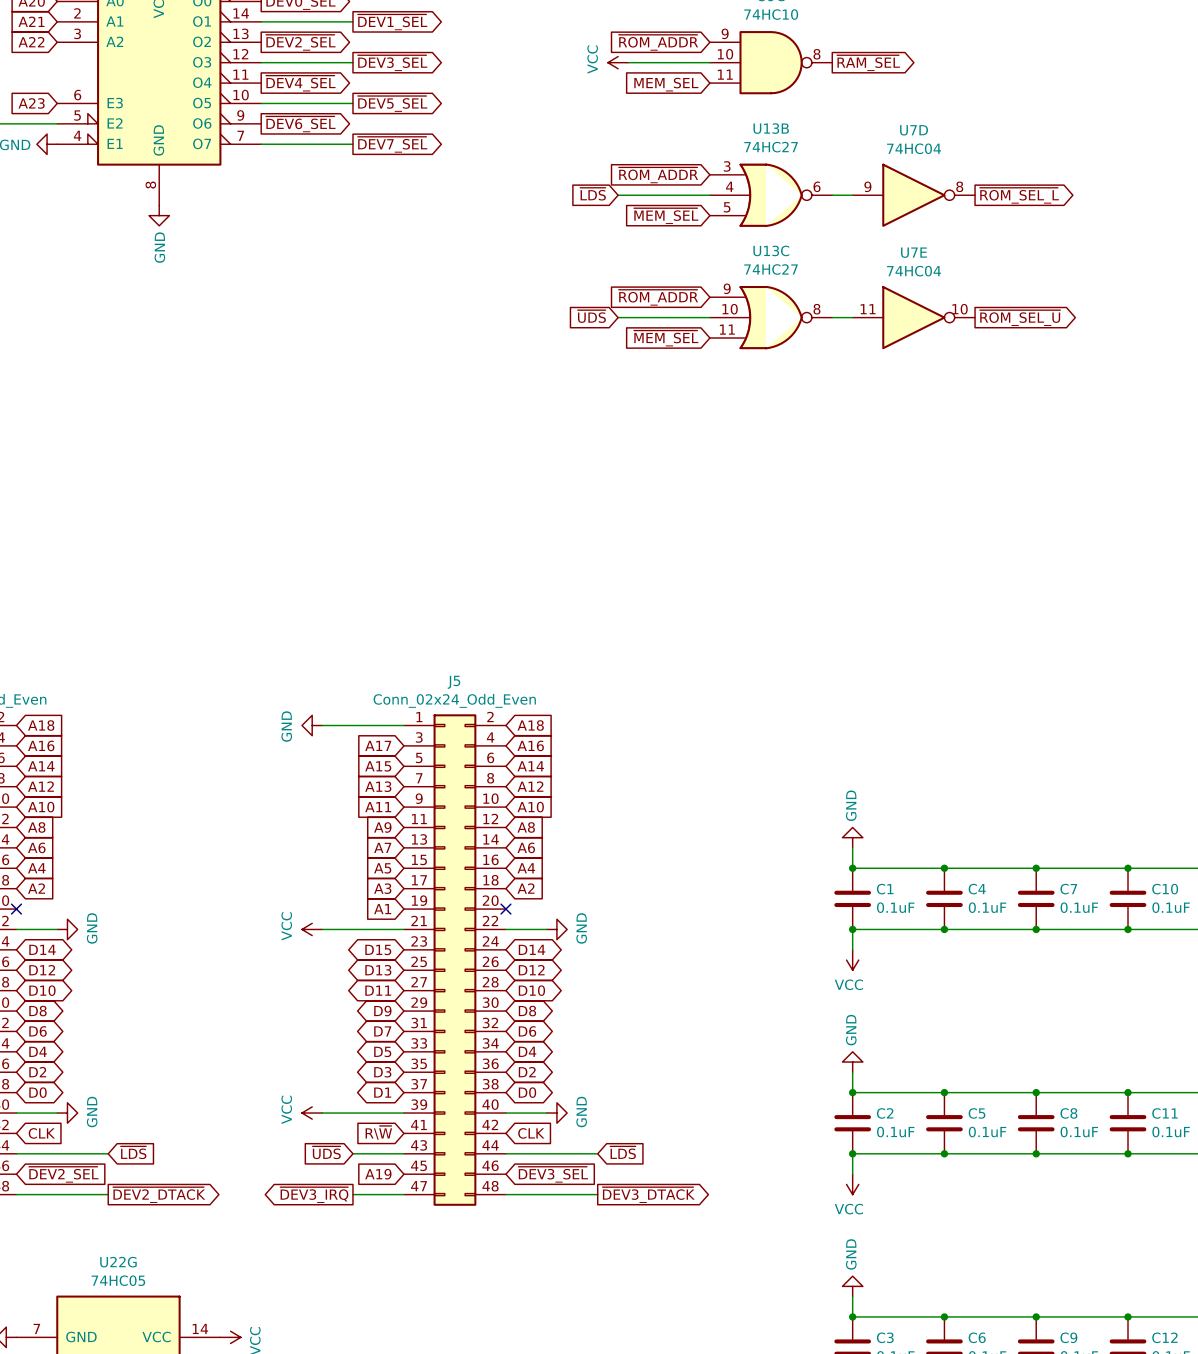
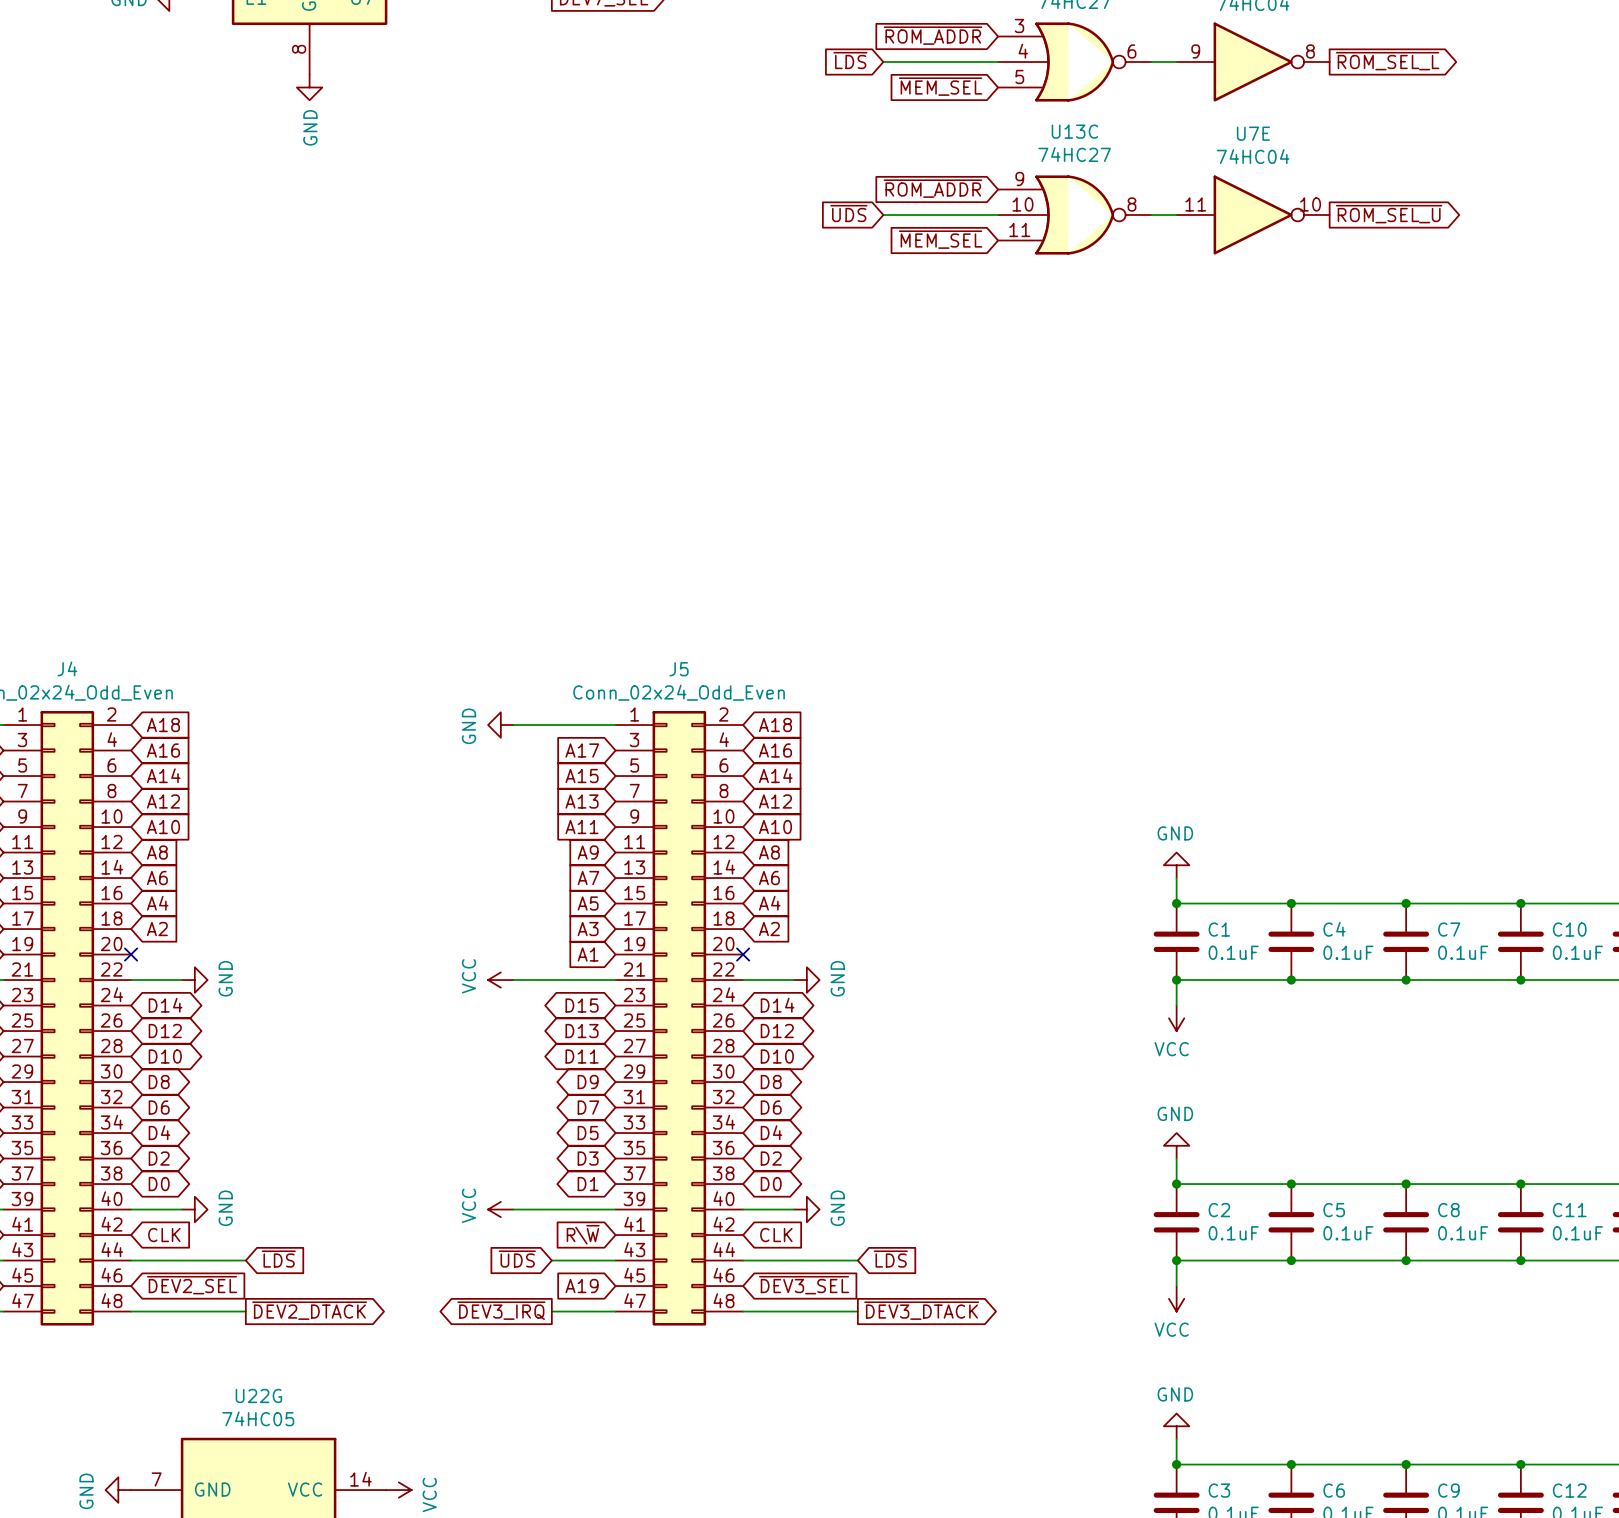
power symbol text rotation: 0° (851, 805) -> 90° clockwise (1175, 833)
power symbol text rotation: 0° (851, 1030) -> 90° clockwise (1175, 1113)
power symbol text rotation: 0° (851, 1254) -> 90° clockwise (1175, 1394)

